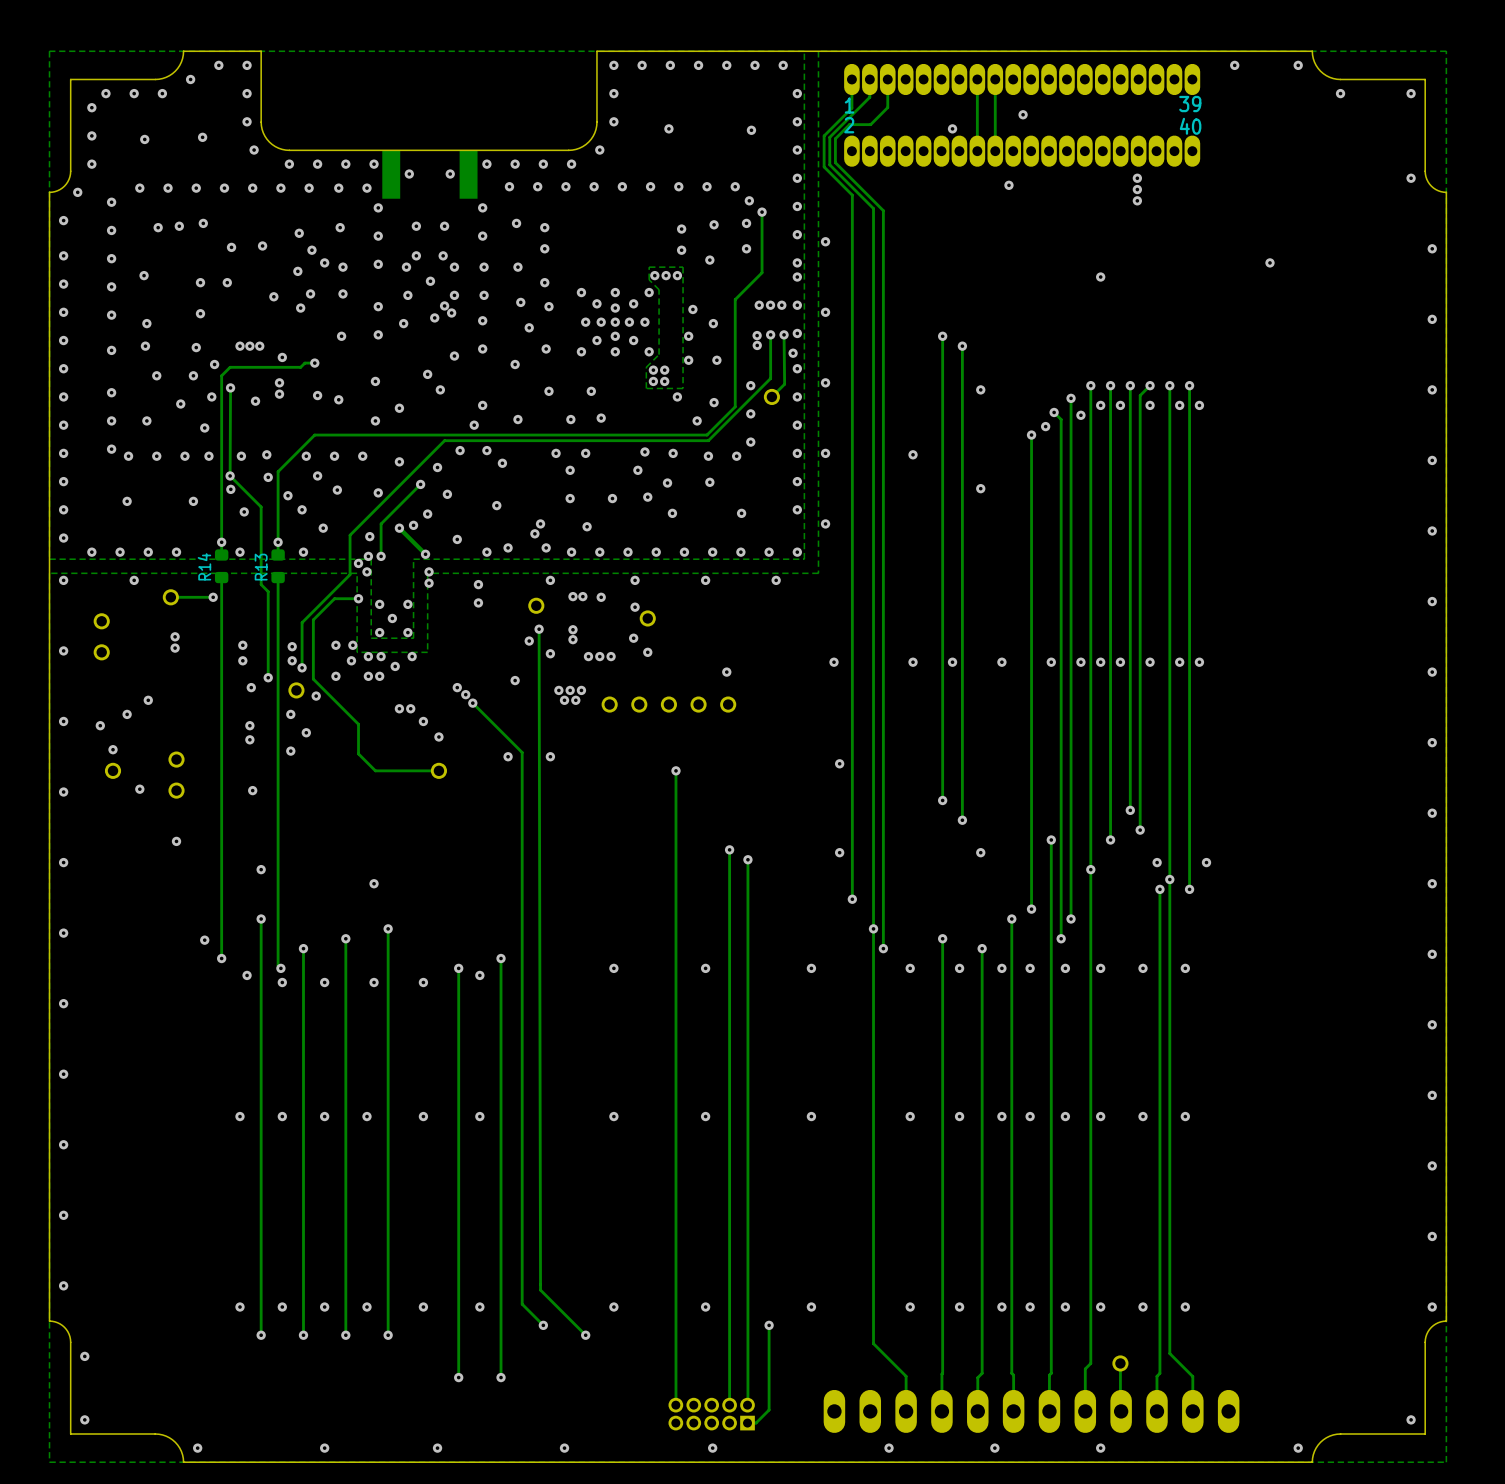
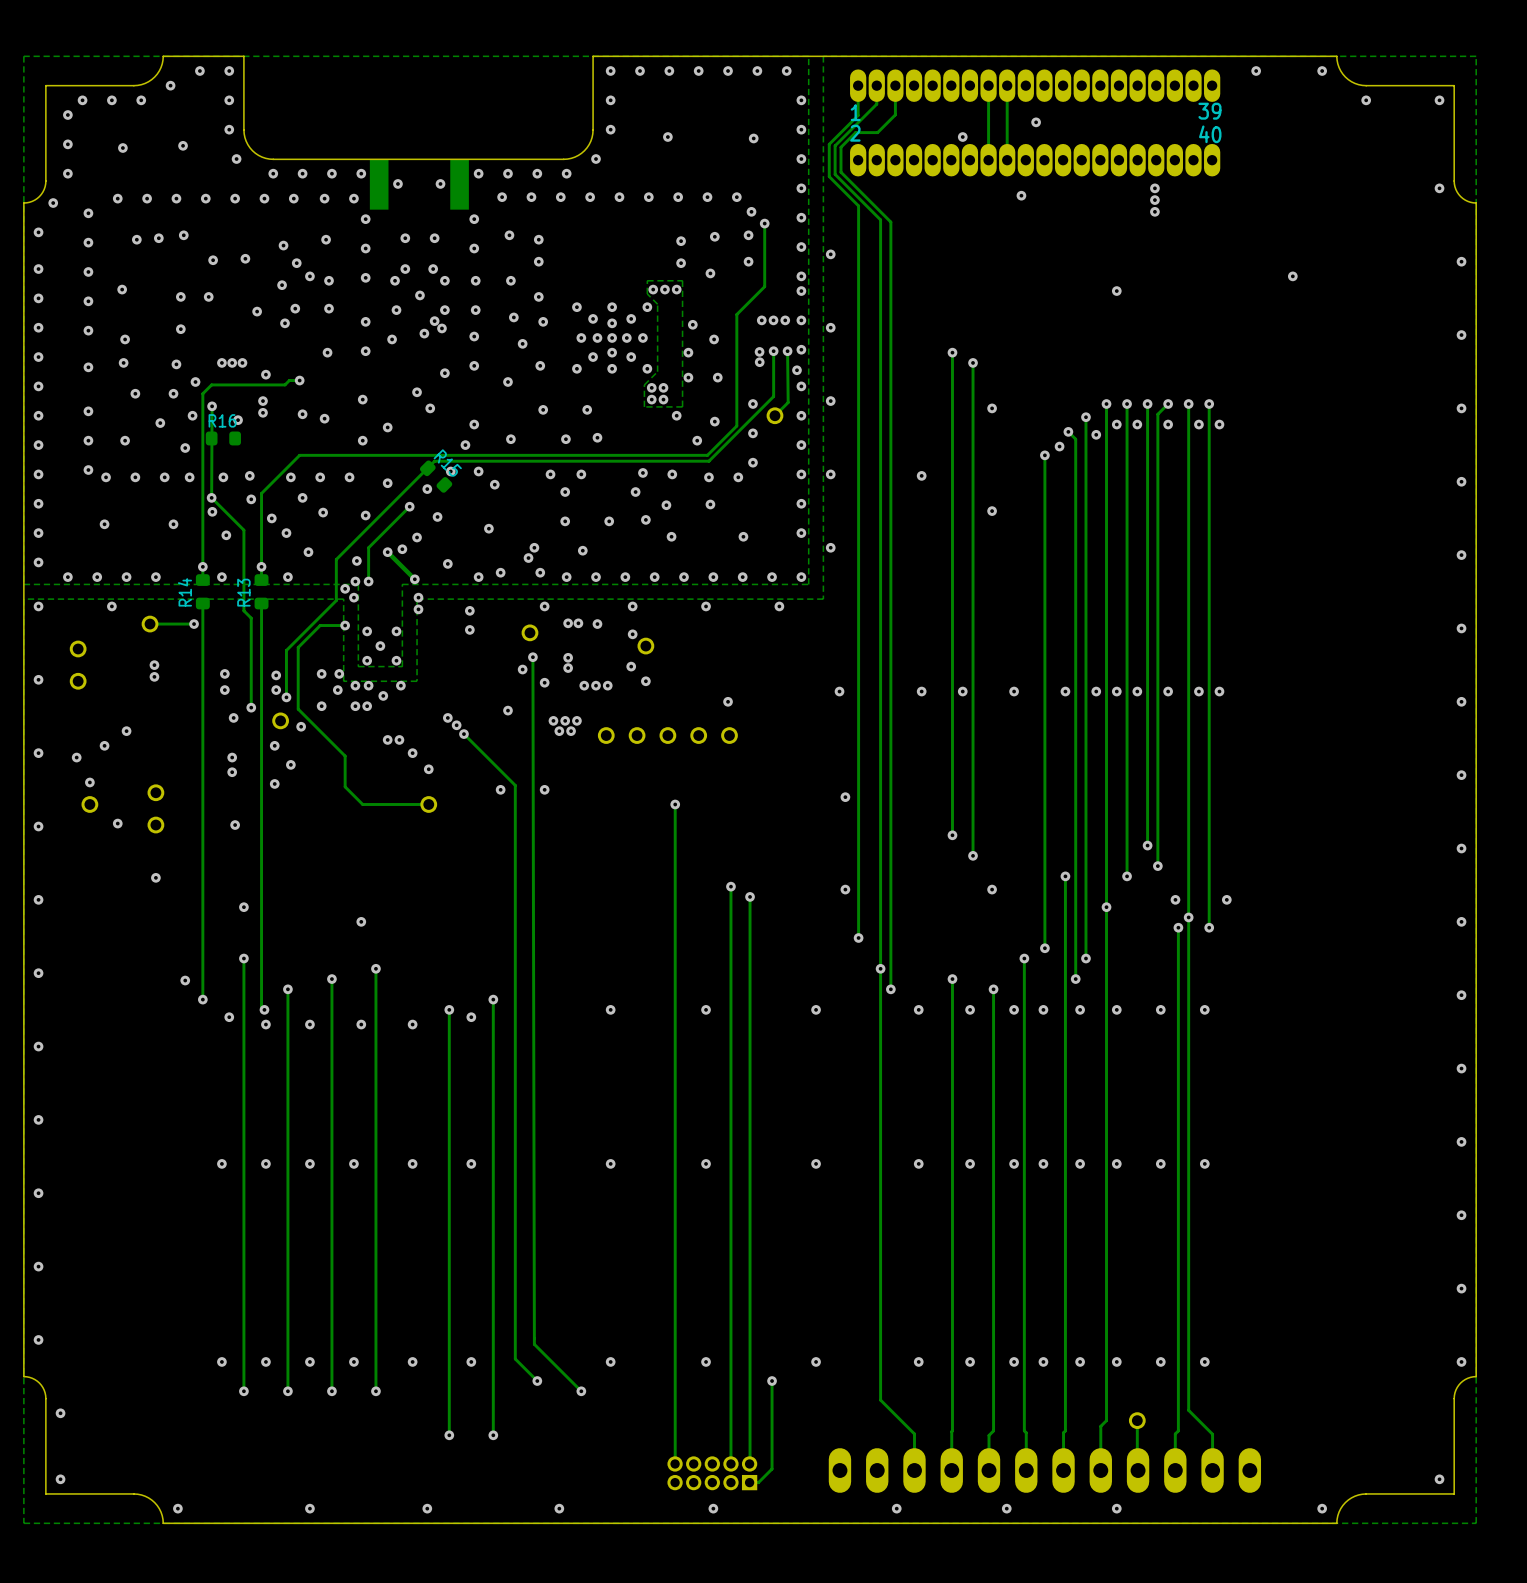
R16: none -> (223, 438)
R15: none -> (436, 476)

